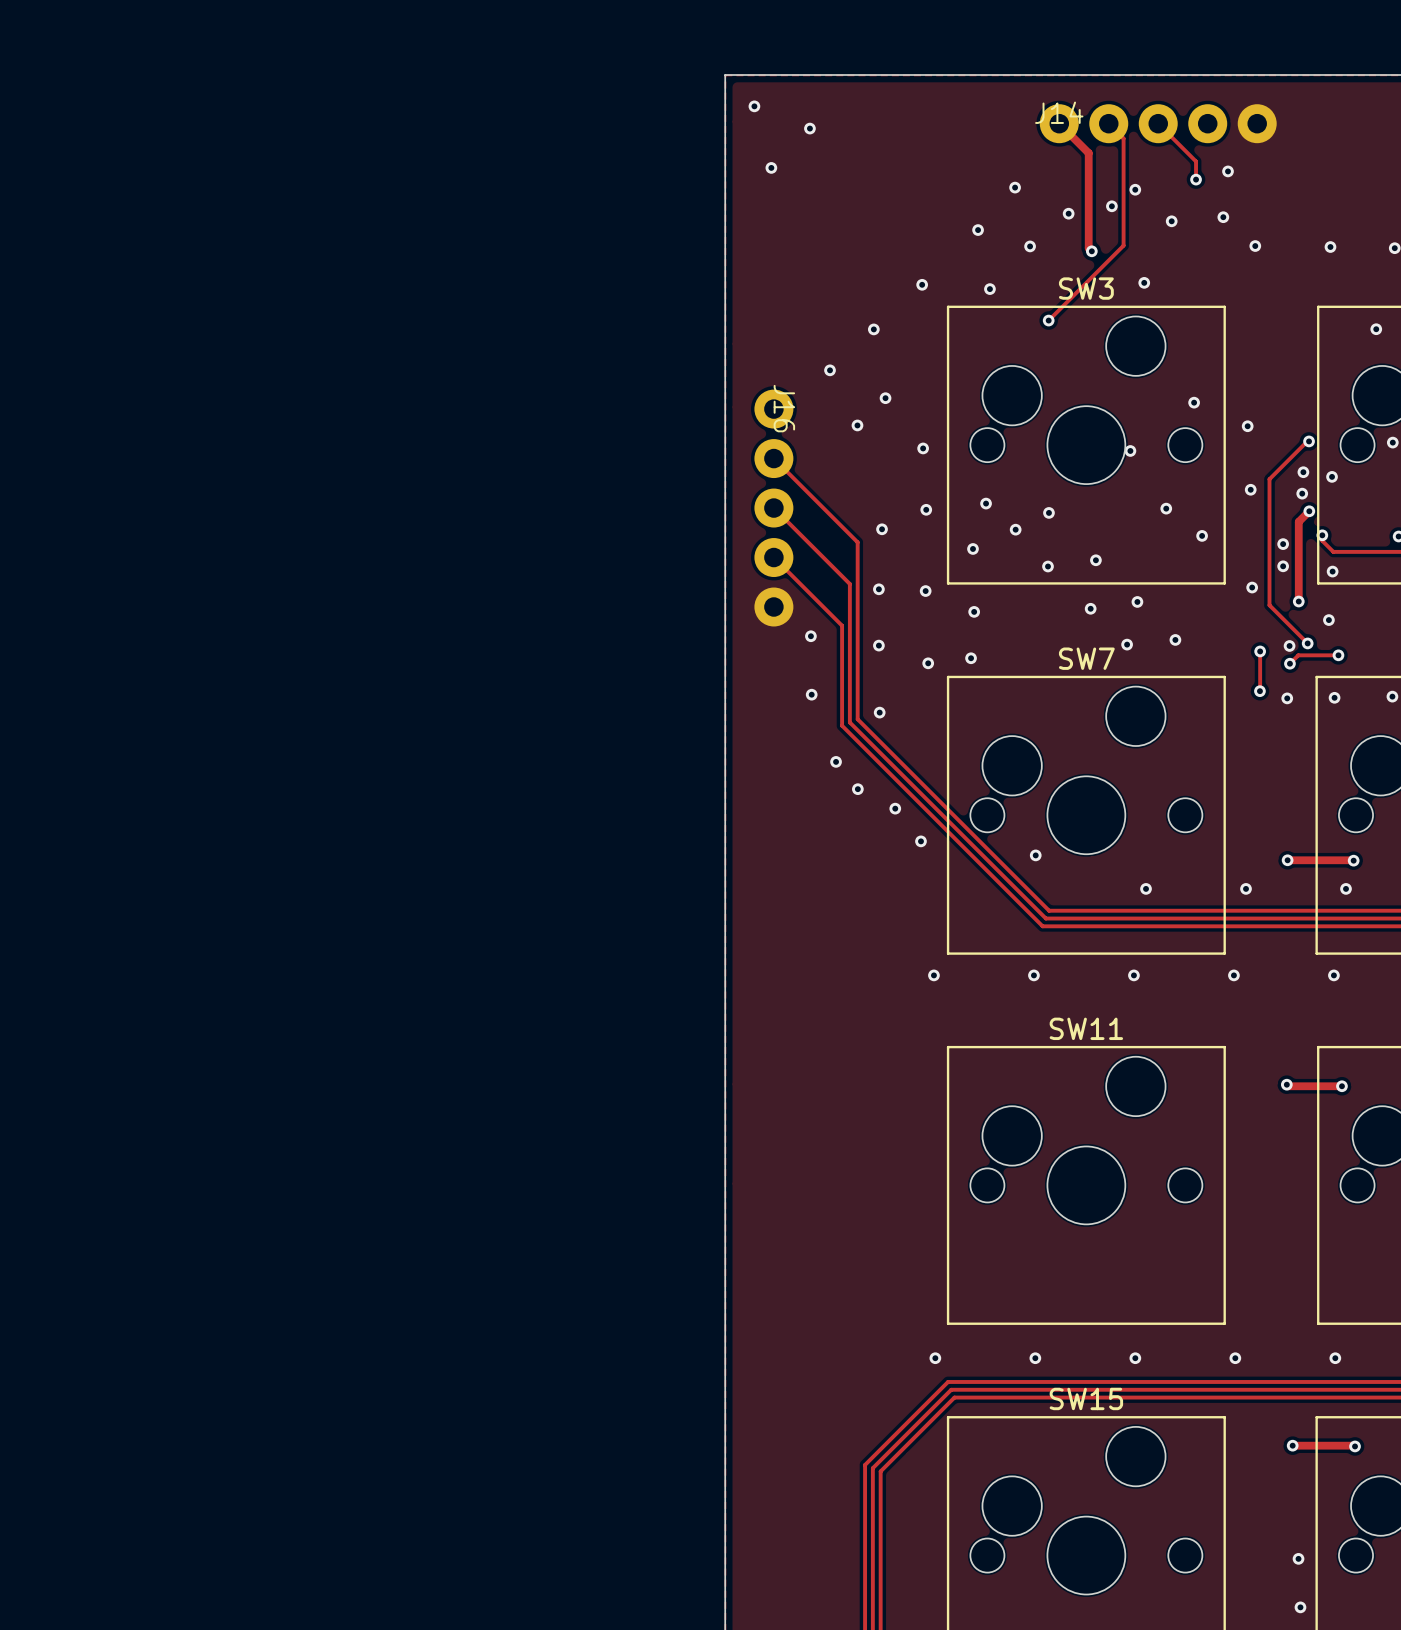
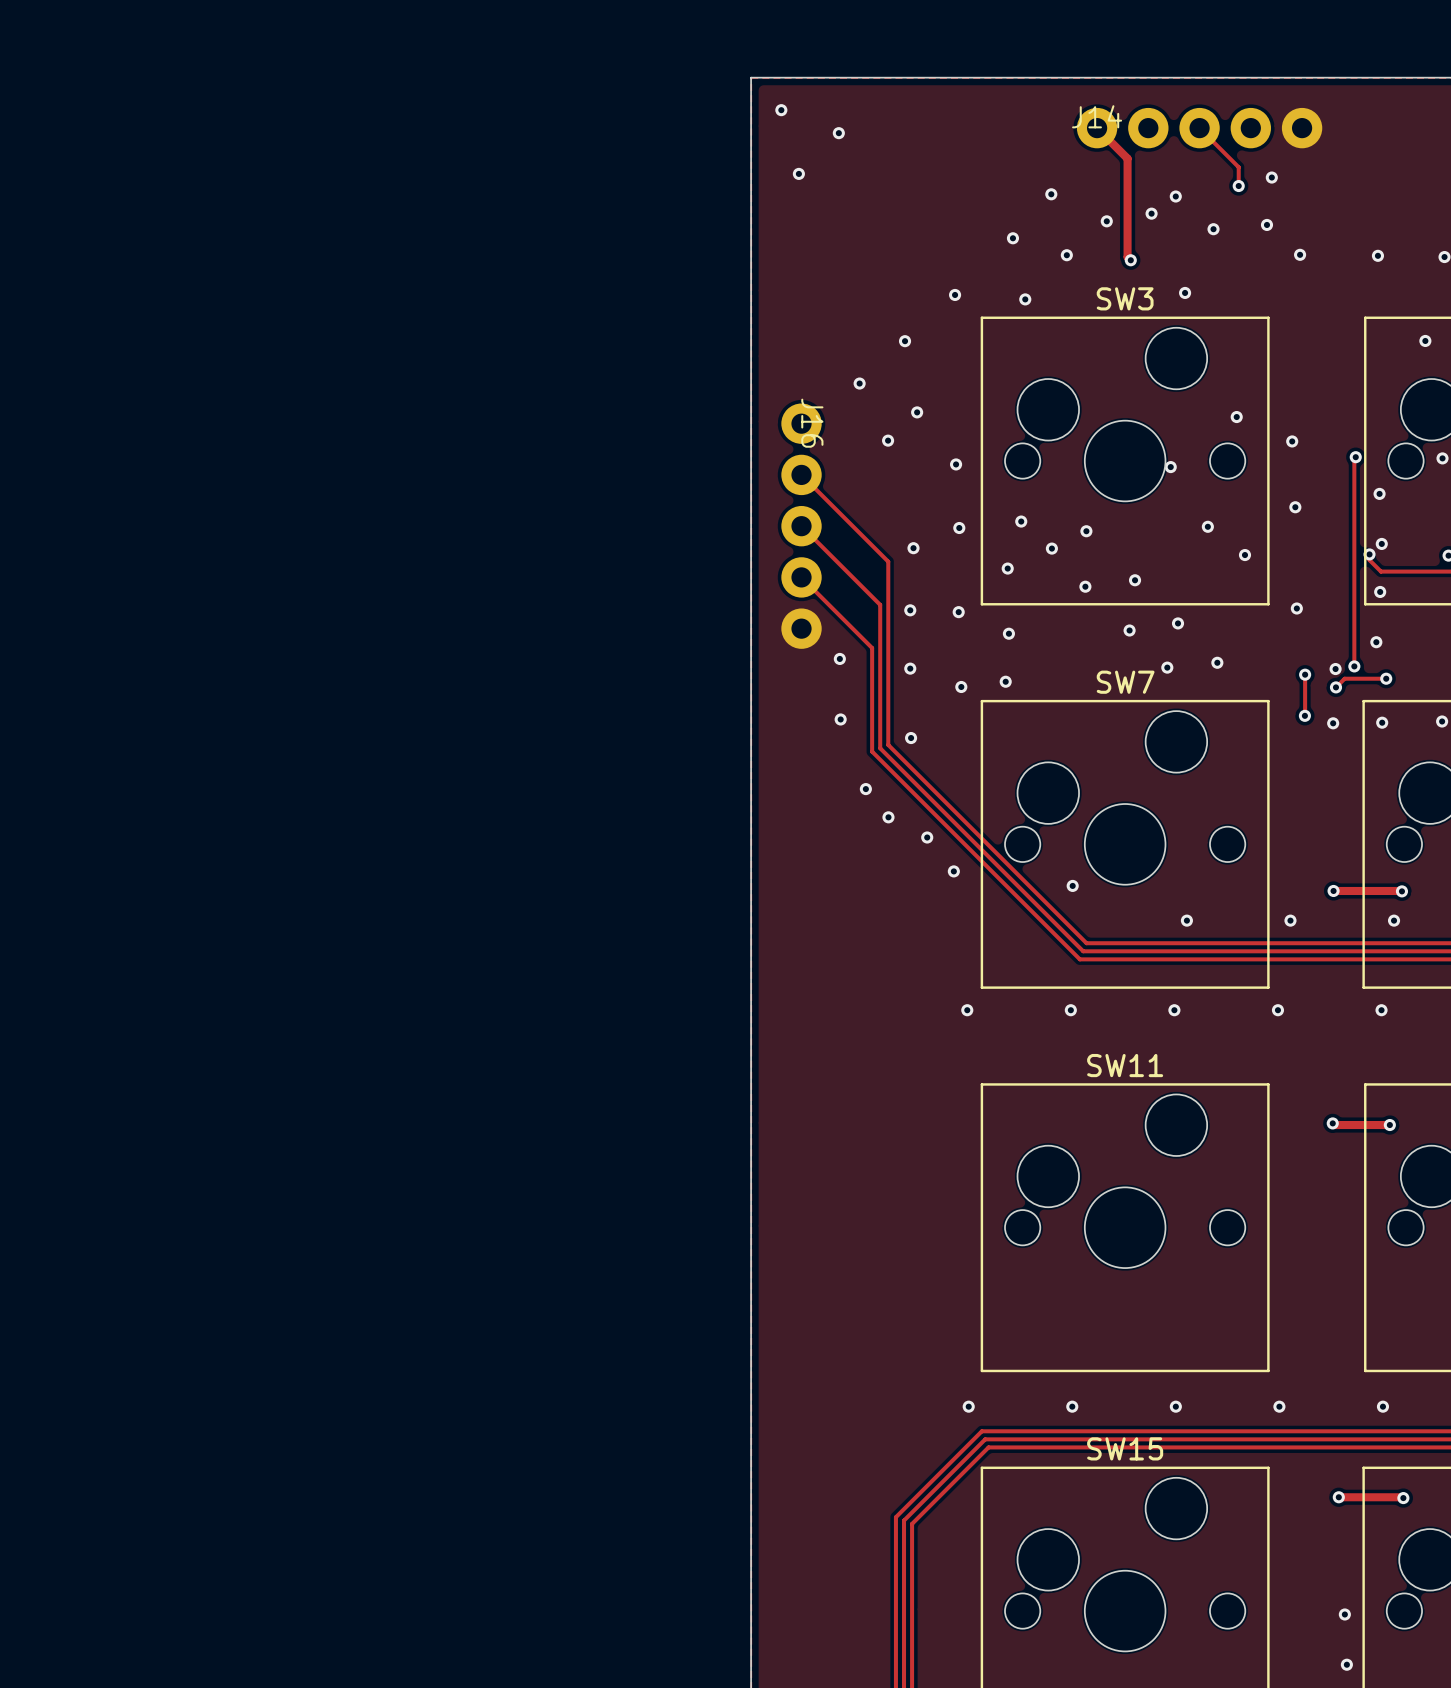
track: (1108, 123) (1123, 138) (1123, 245) (1048, 320) -> none
via: (1048, 320) -> none
track: (1309, 441) (1269, 479) (1269, 605) (1307, 643) -> (1355, 457) (1354, 666)
via: (1303, 472) -> none
via: (1302, 493) -> none
track: (1309, 511) (1298, 521) (1298, 601) -> none
via: (1309, 511) -> none
via: none -> (1381, 543)
via: (1283, 544) -> none
via: (1283, 566) -> none
via: (1298, 601) -> none

